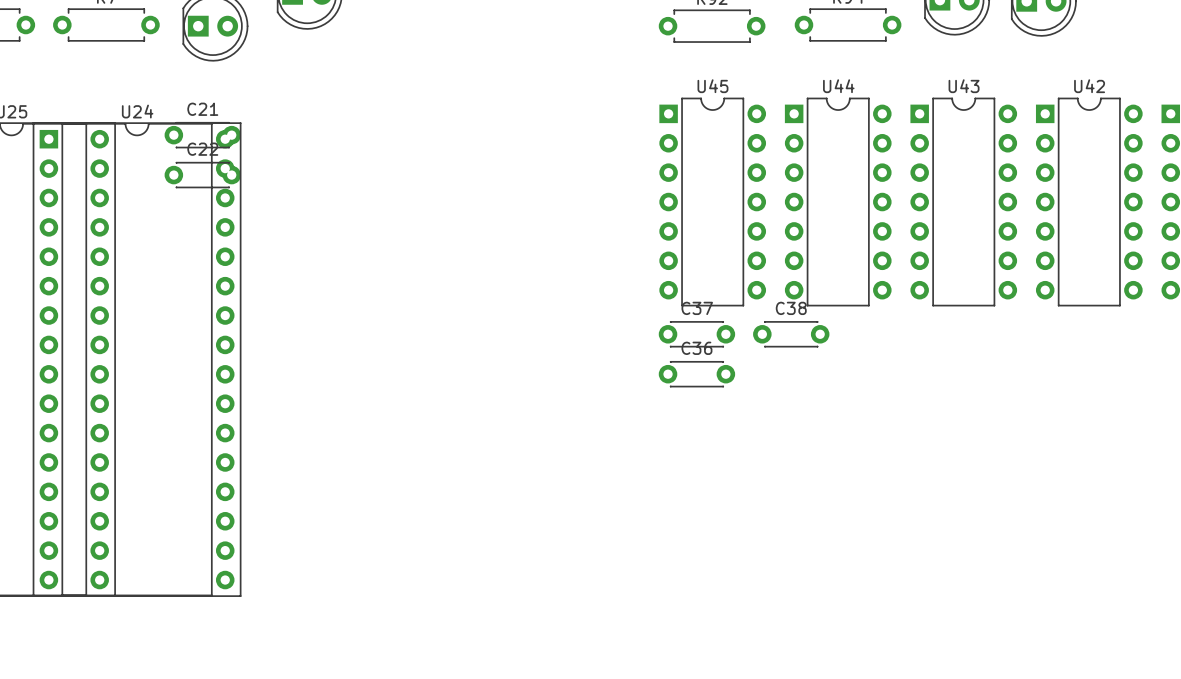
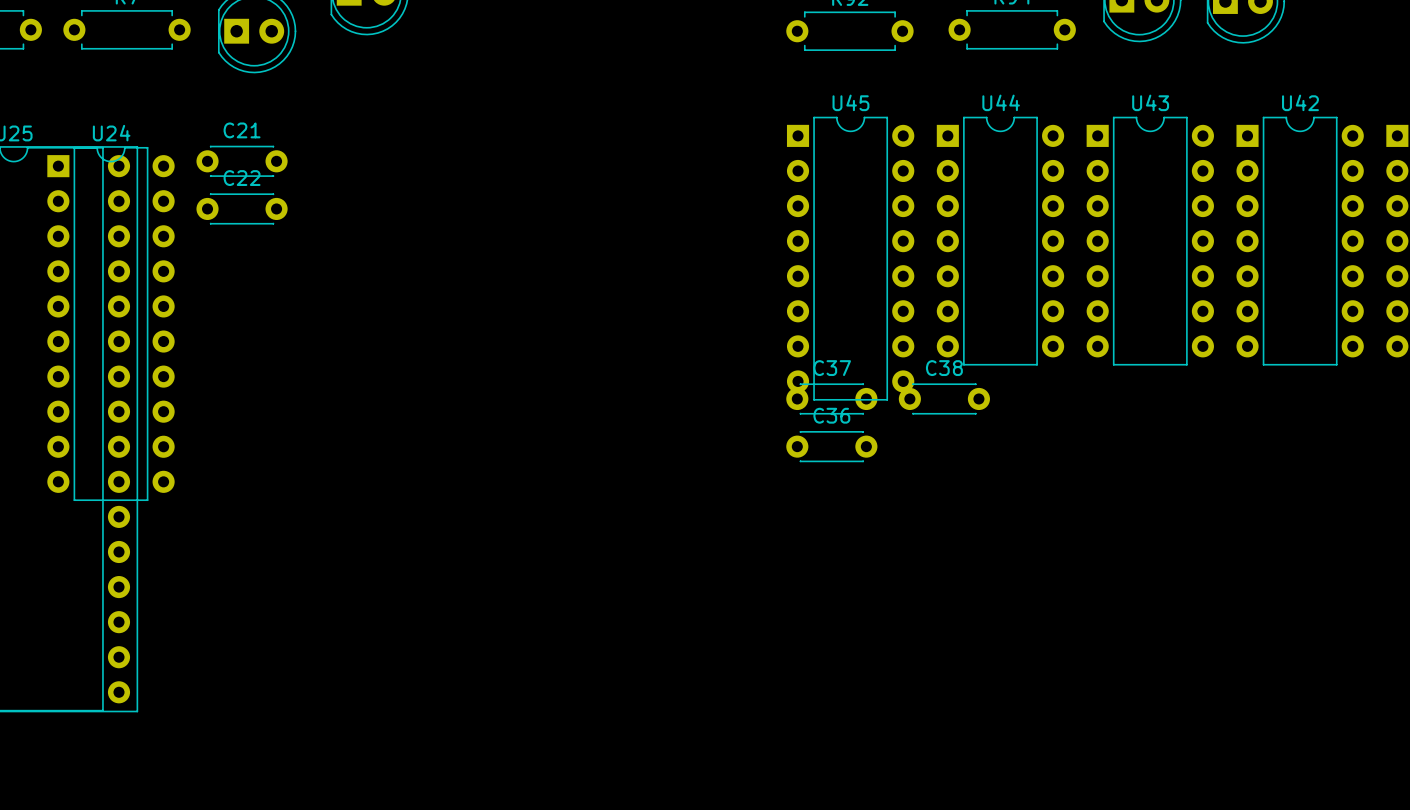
U45 footprint: [659, 97, 767, 307] -> [786, 116, 915, 401]
U24 name position: U24 (137, 111) -> U24 (111, 133)
U24 footprint: [32, 122, 242, 597] -> [47, 146, 175, 502]

